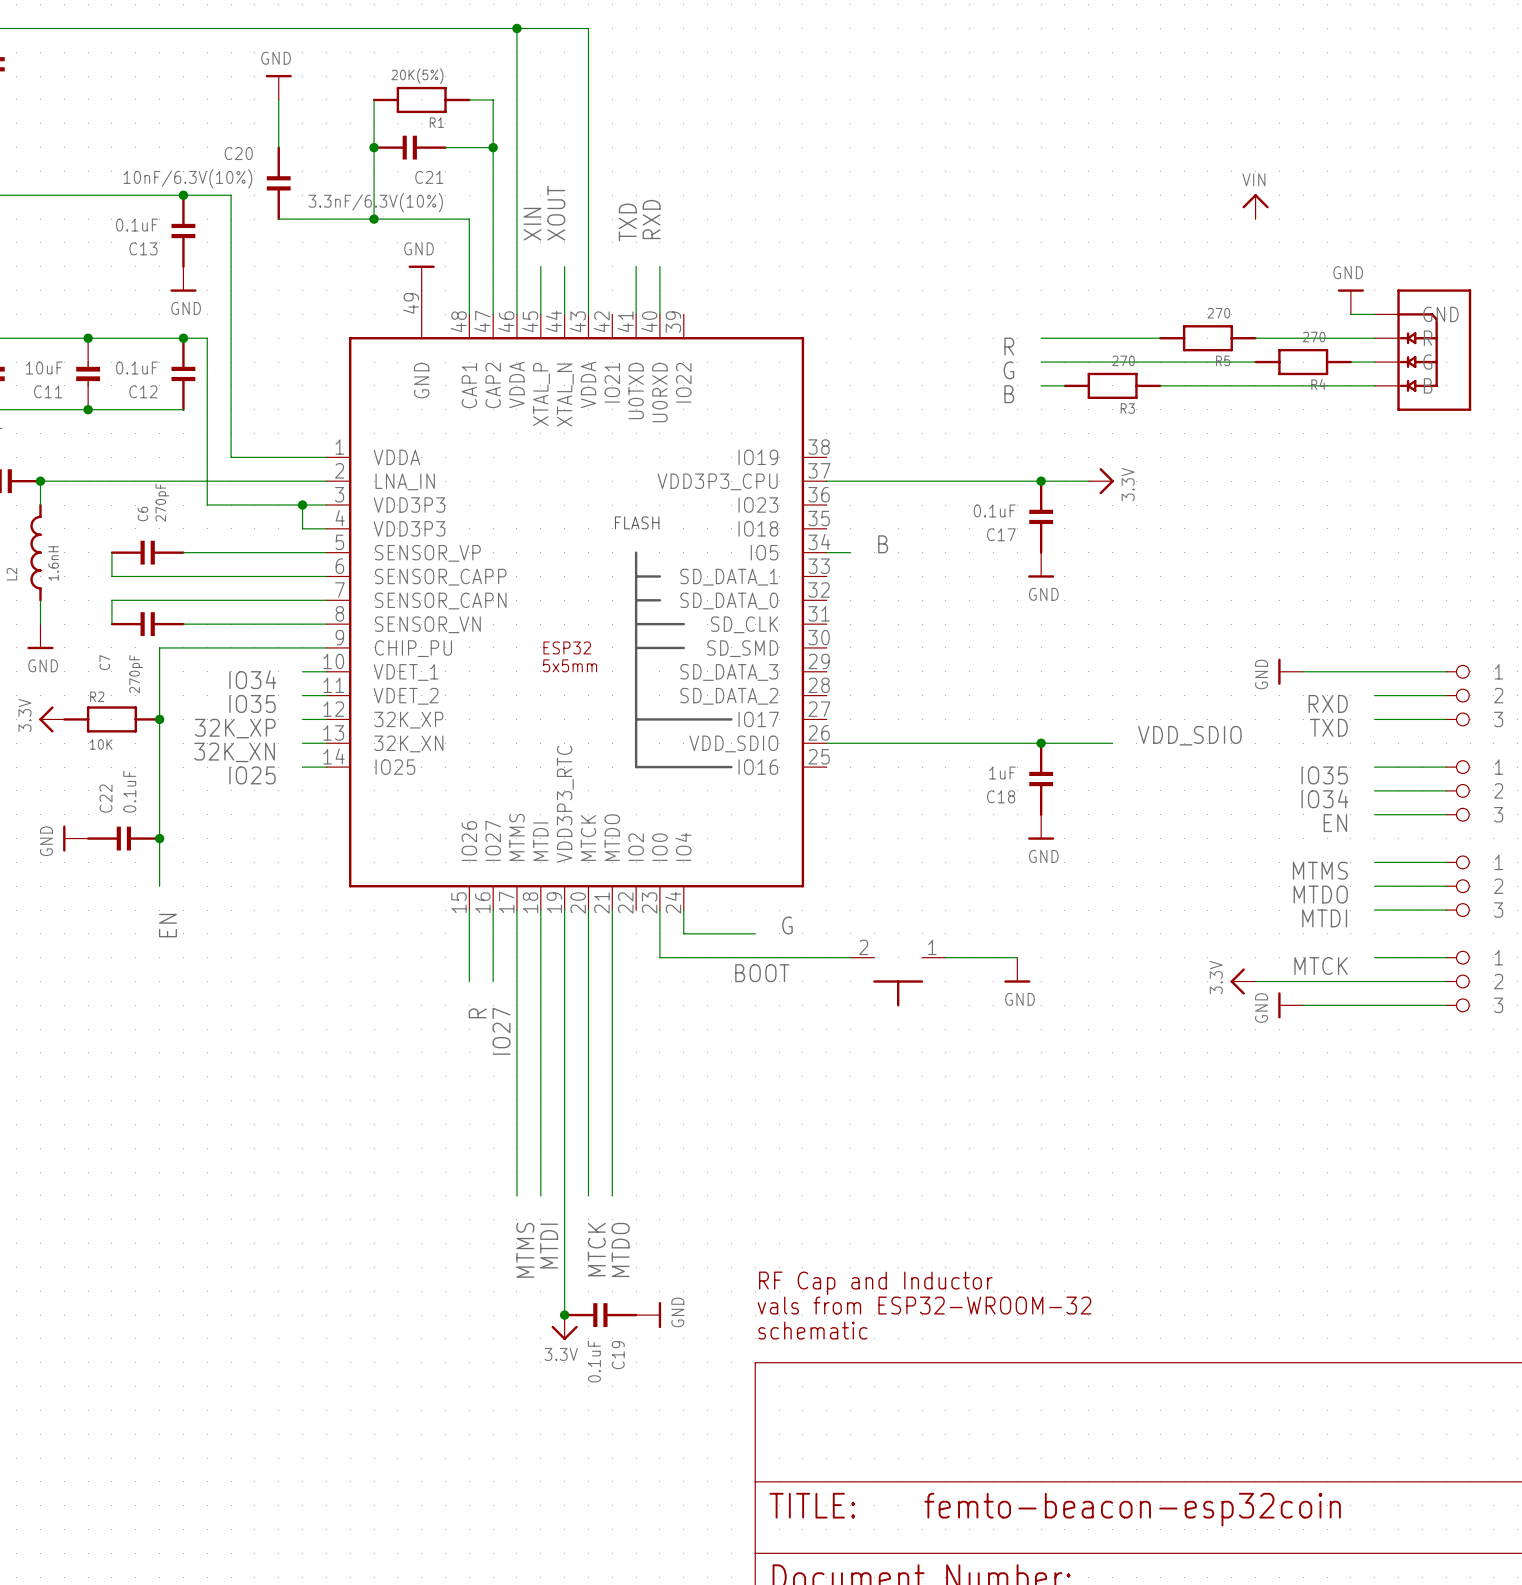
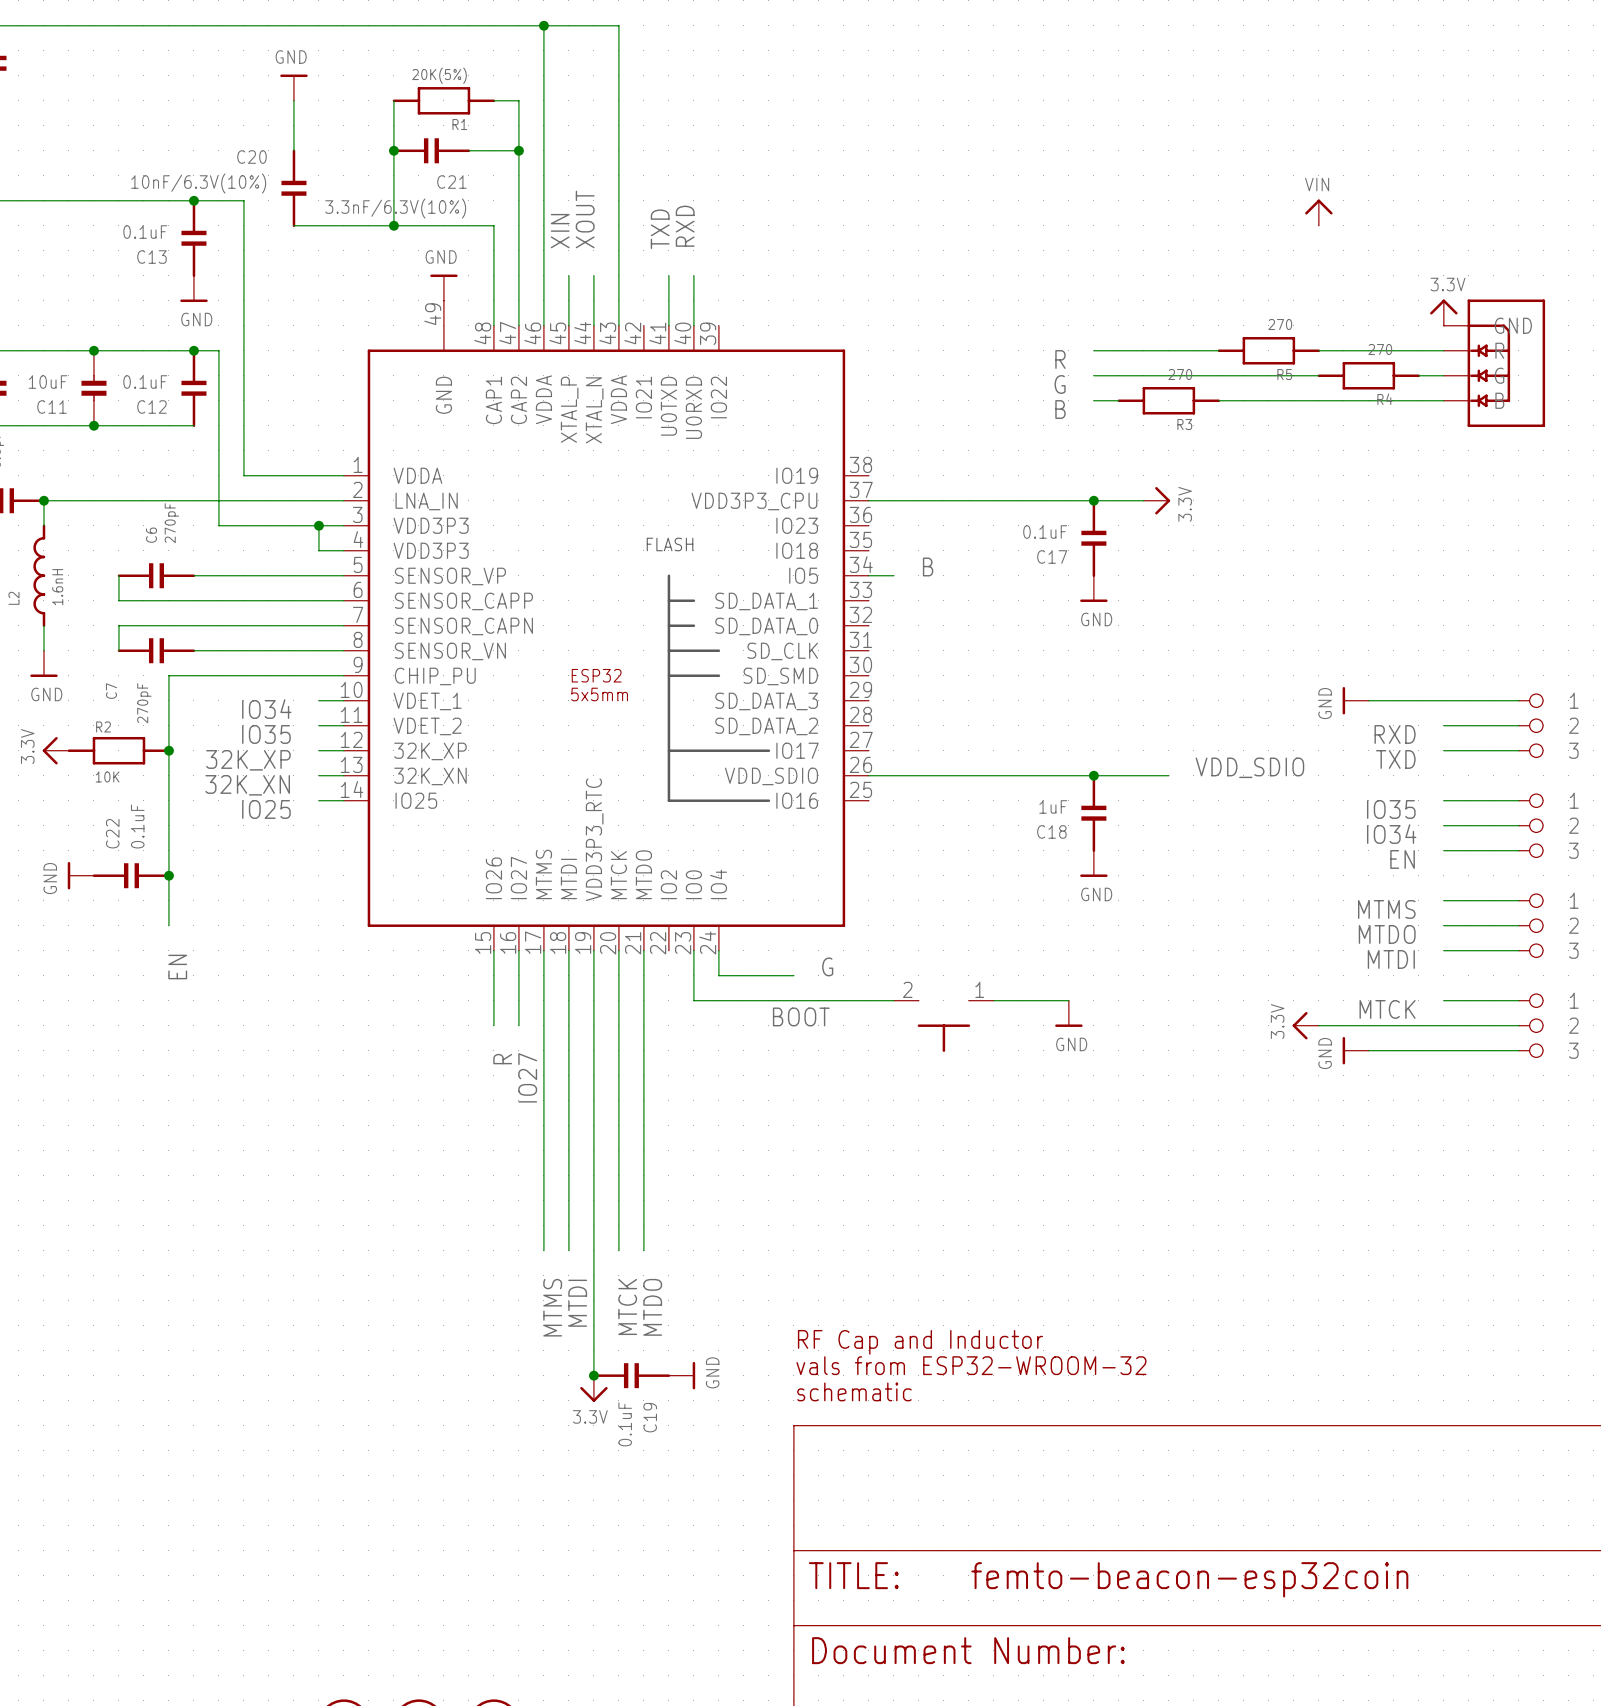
power symbol: GND (1350, 301) -> none
power symbol: none -> 3.3V (1443, 312)
wire: (1350, 314) (1374, 314) -> none

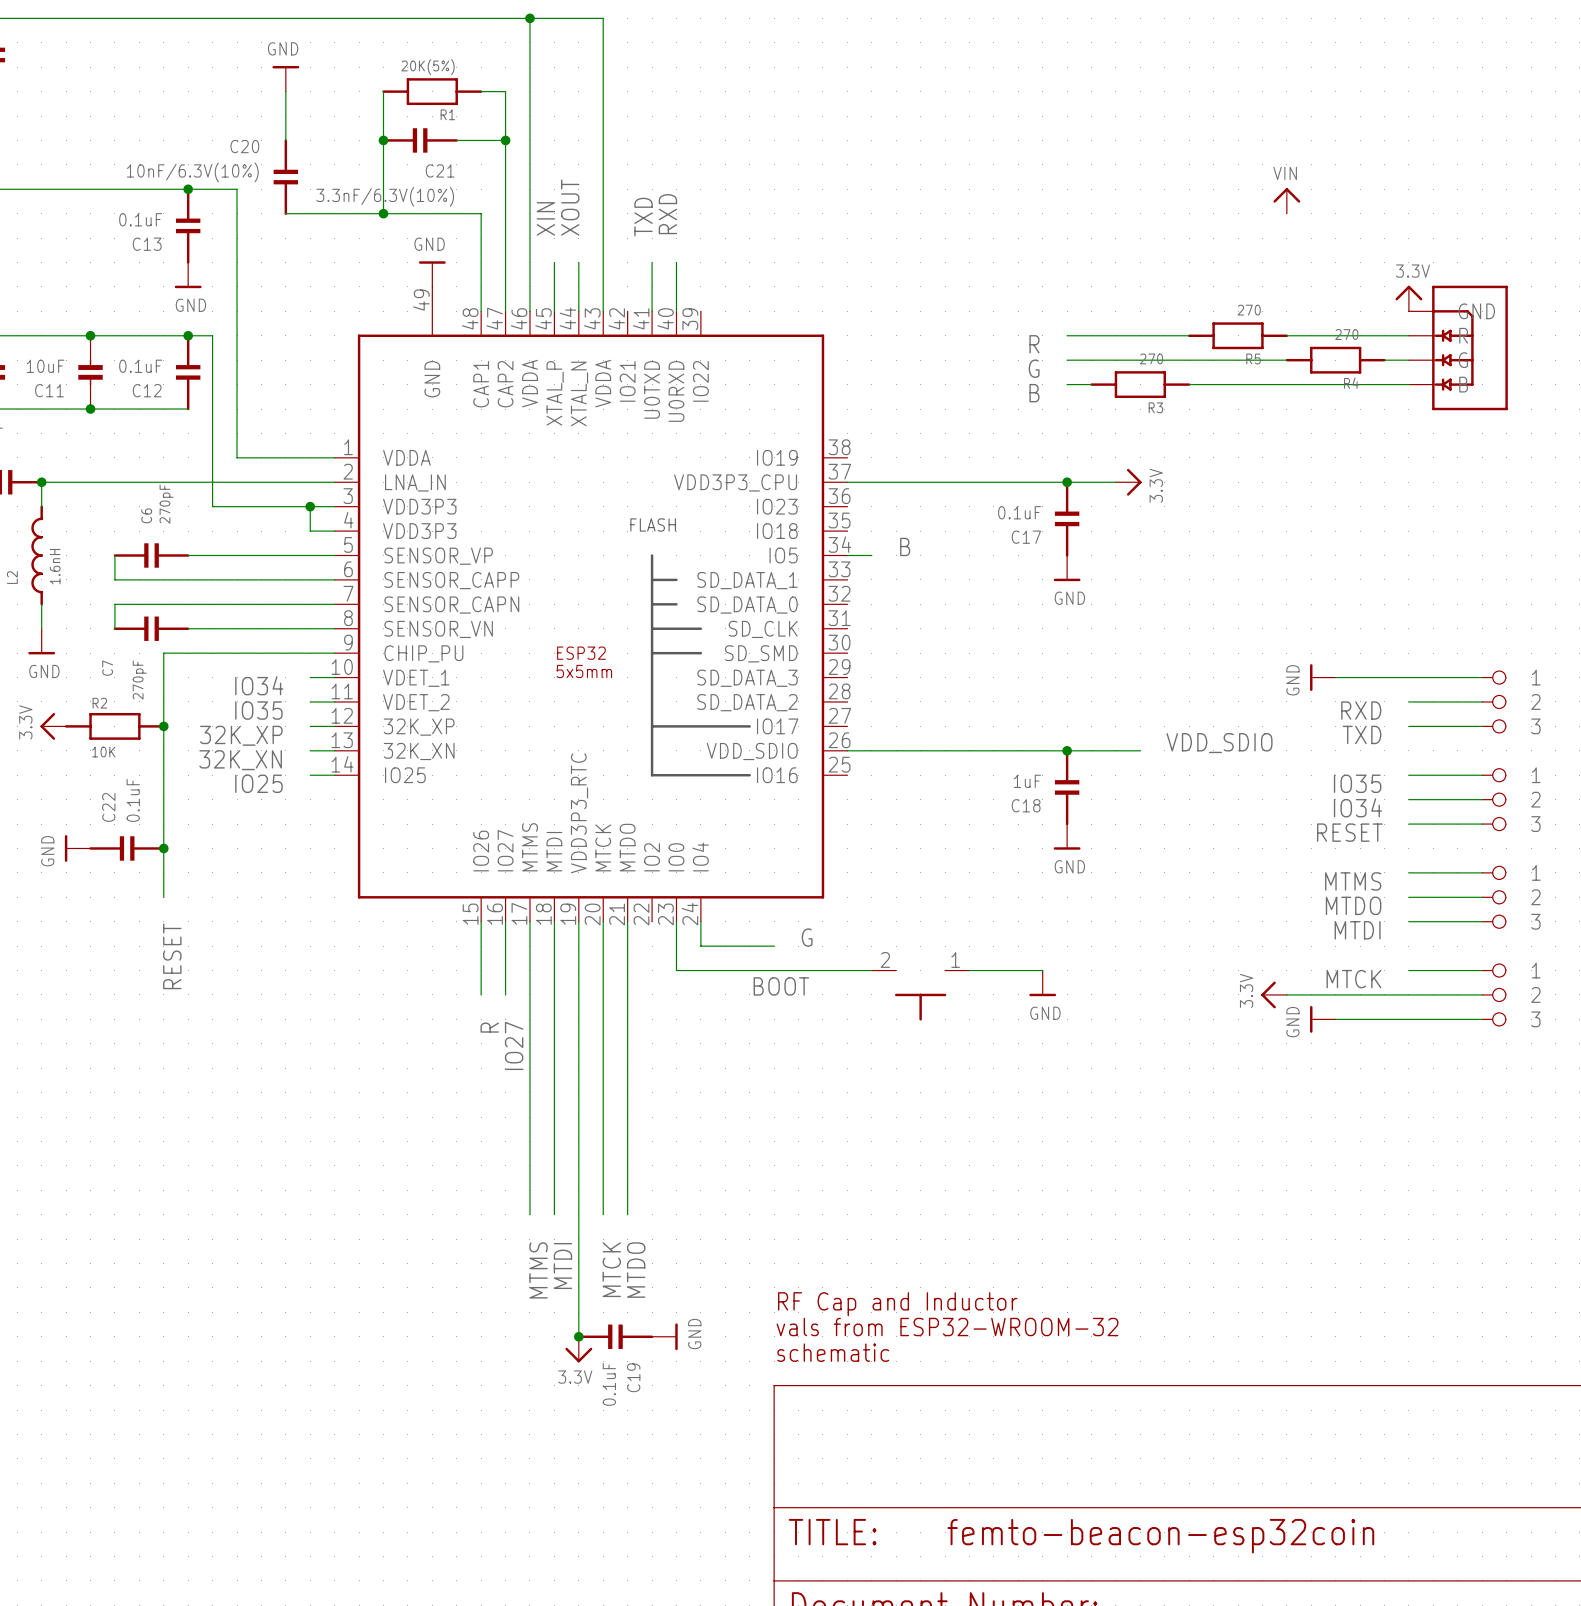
label: EN (1402, 859) -> RESET (1349, 832)
label: EN (177, 967) -> RESET (172, 956)

